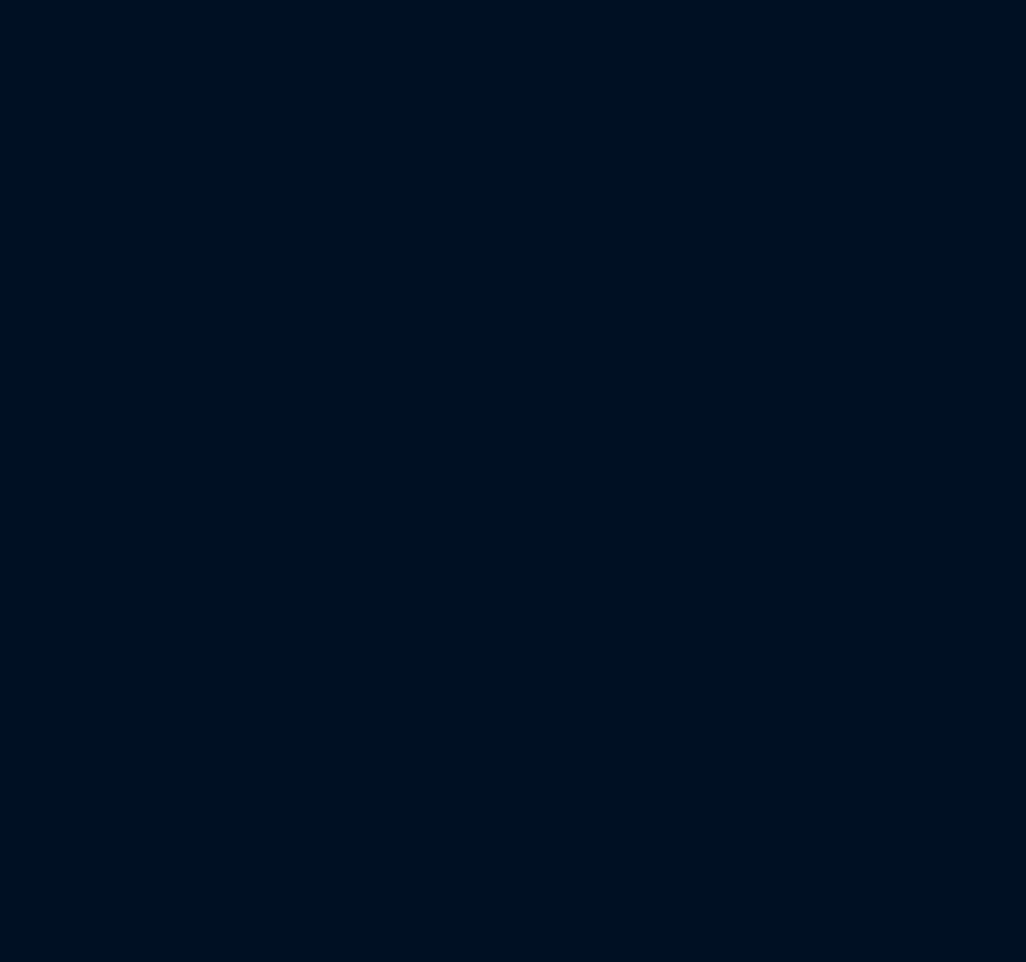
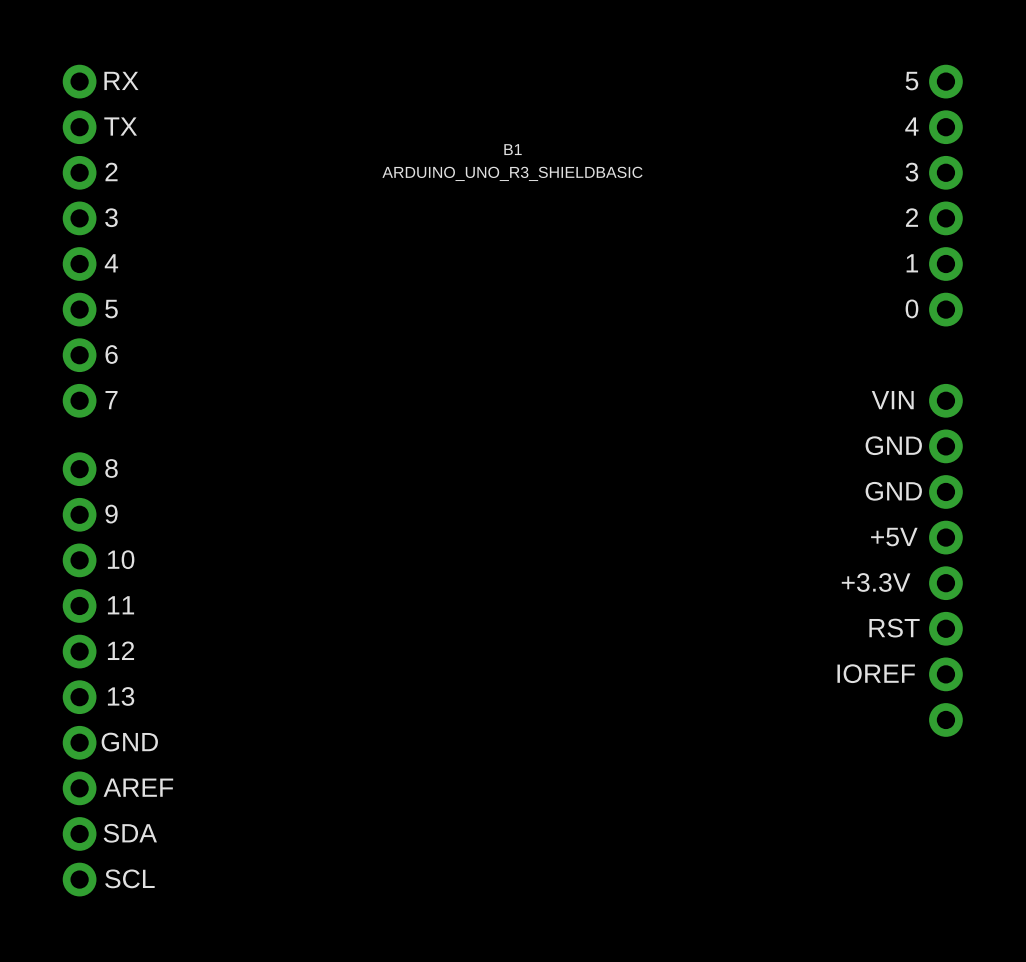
B1: none -> ARDUINO_UNO_R3_SHIELDBASIC (512, 480)

